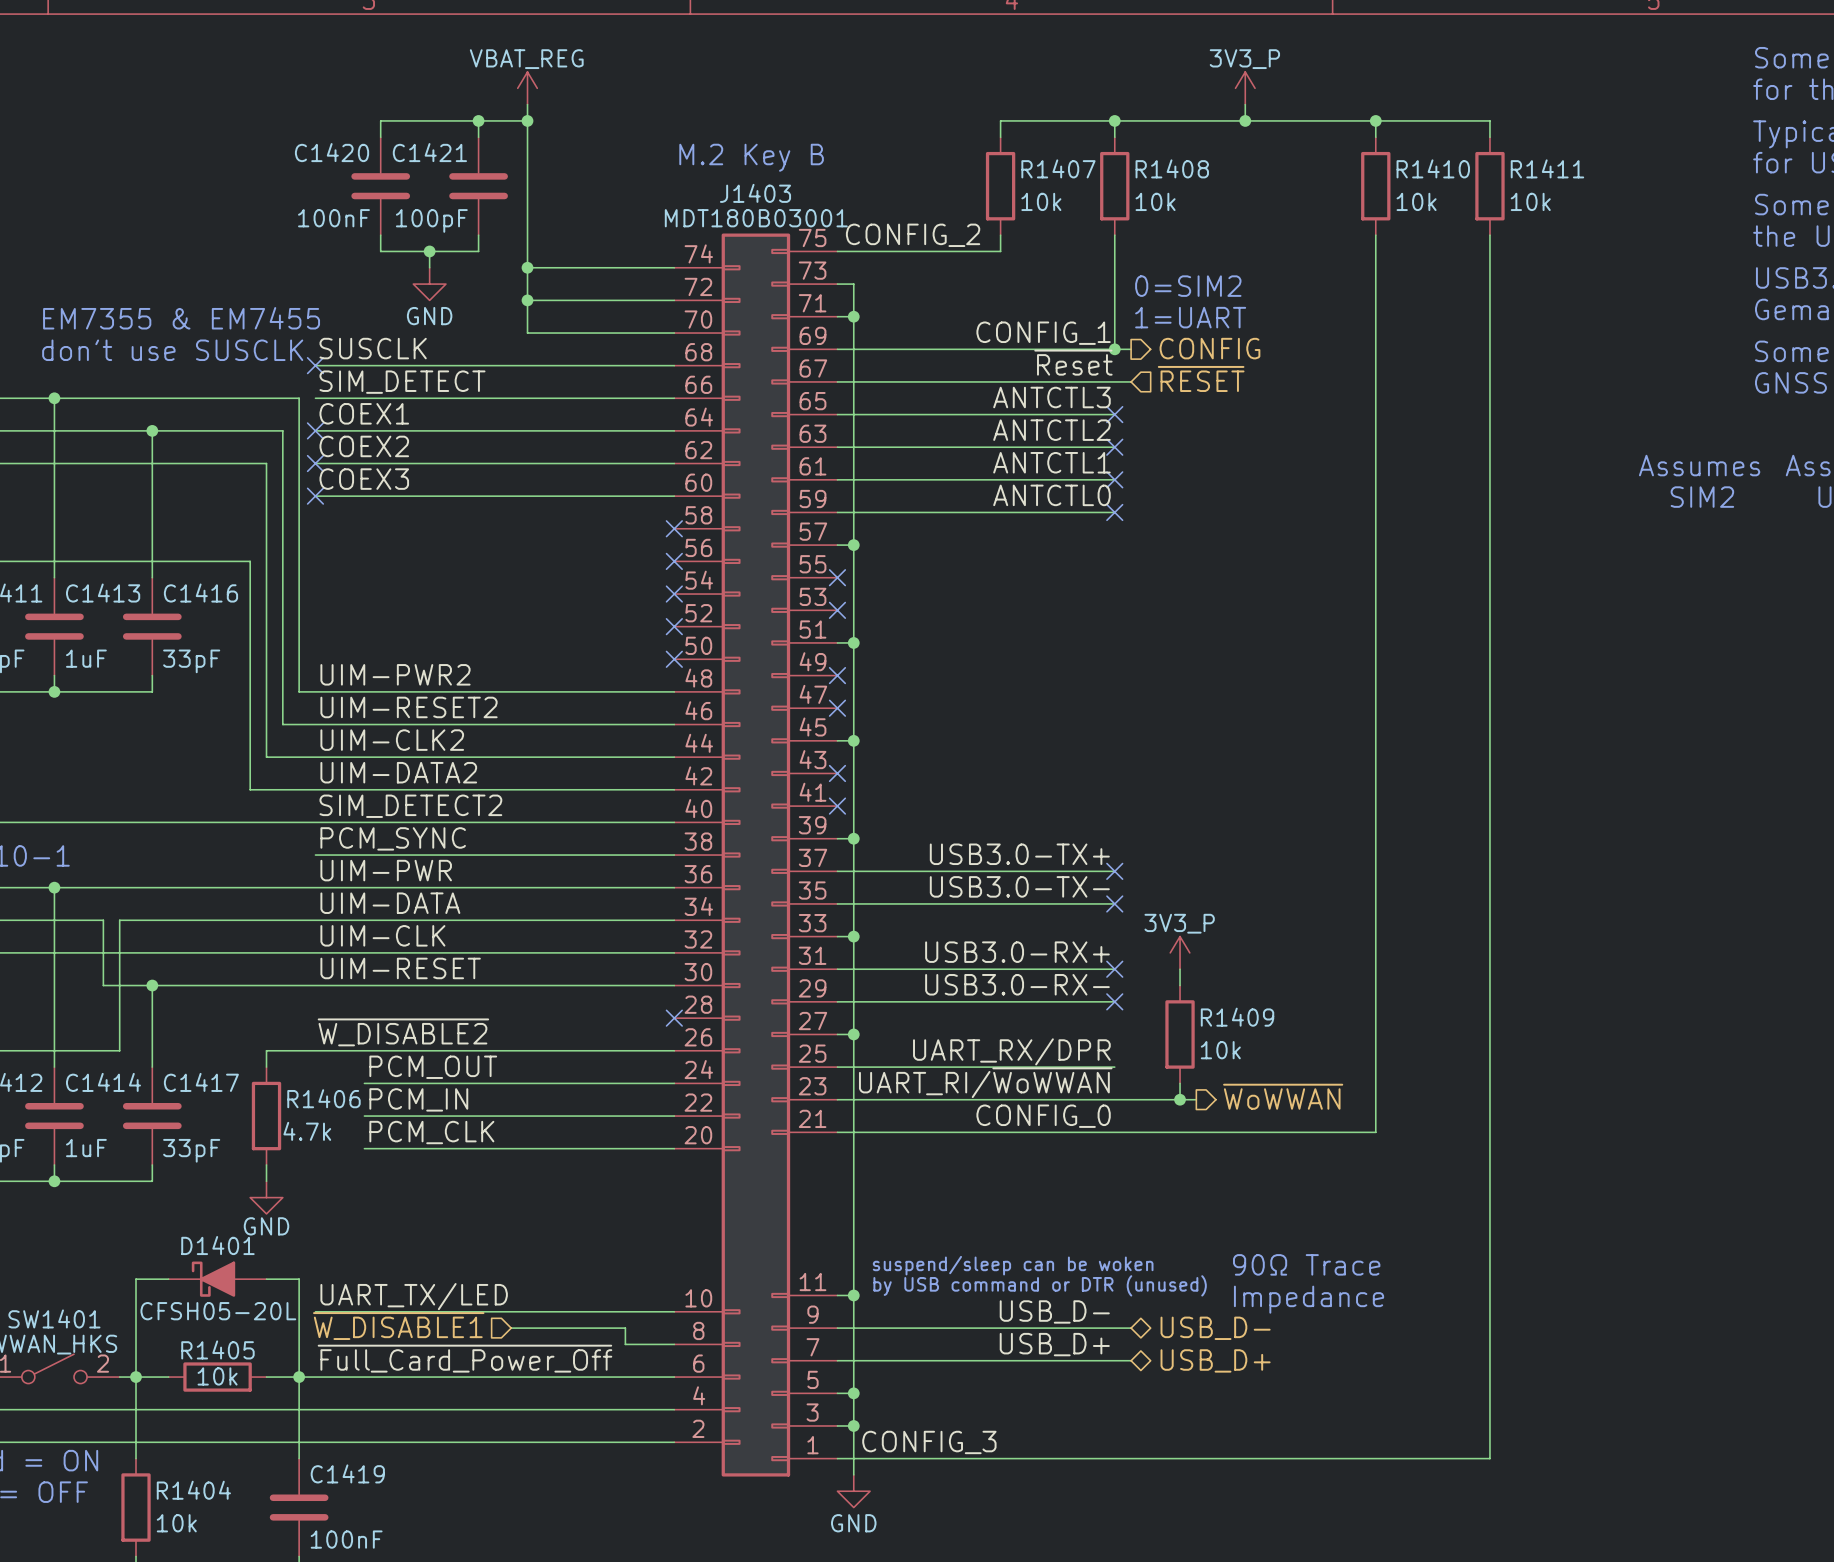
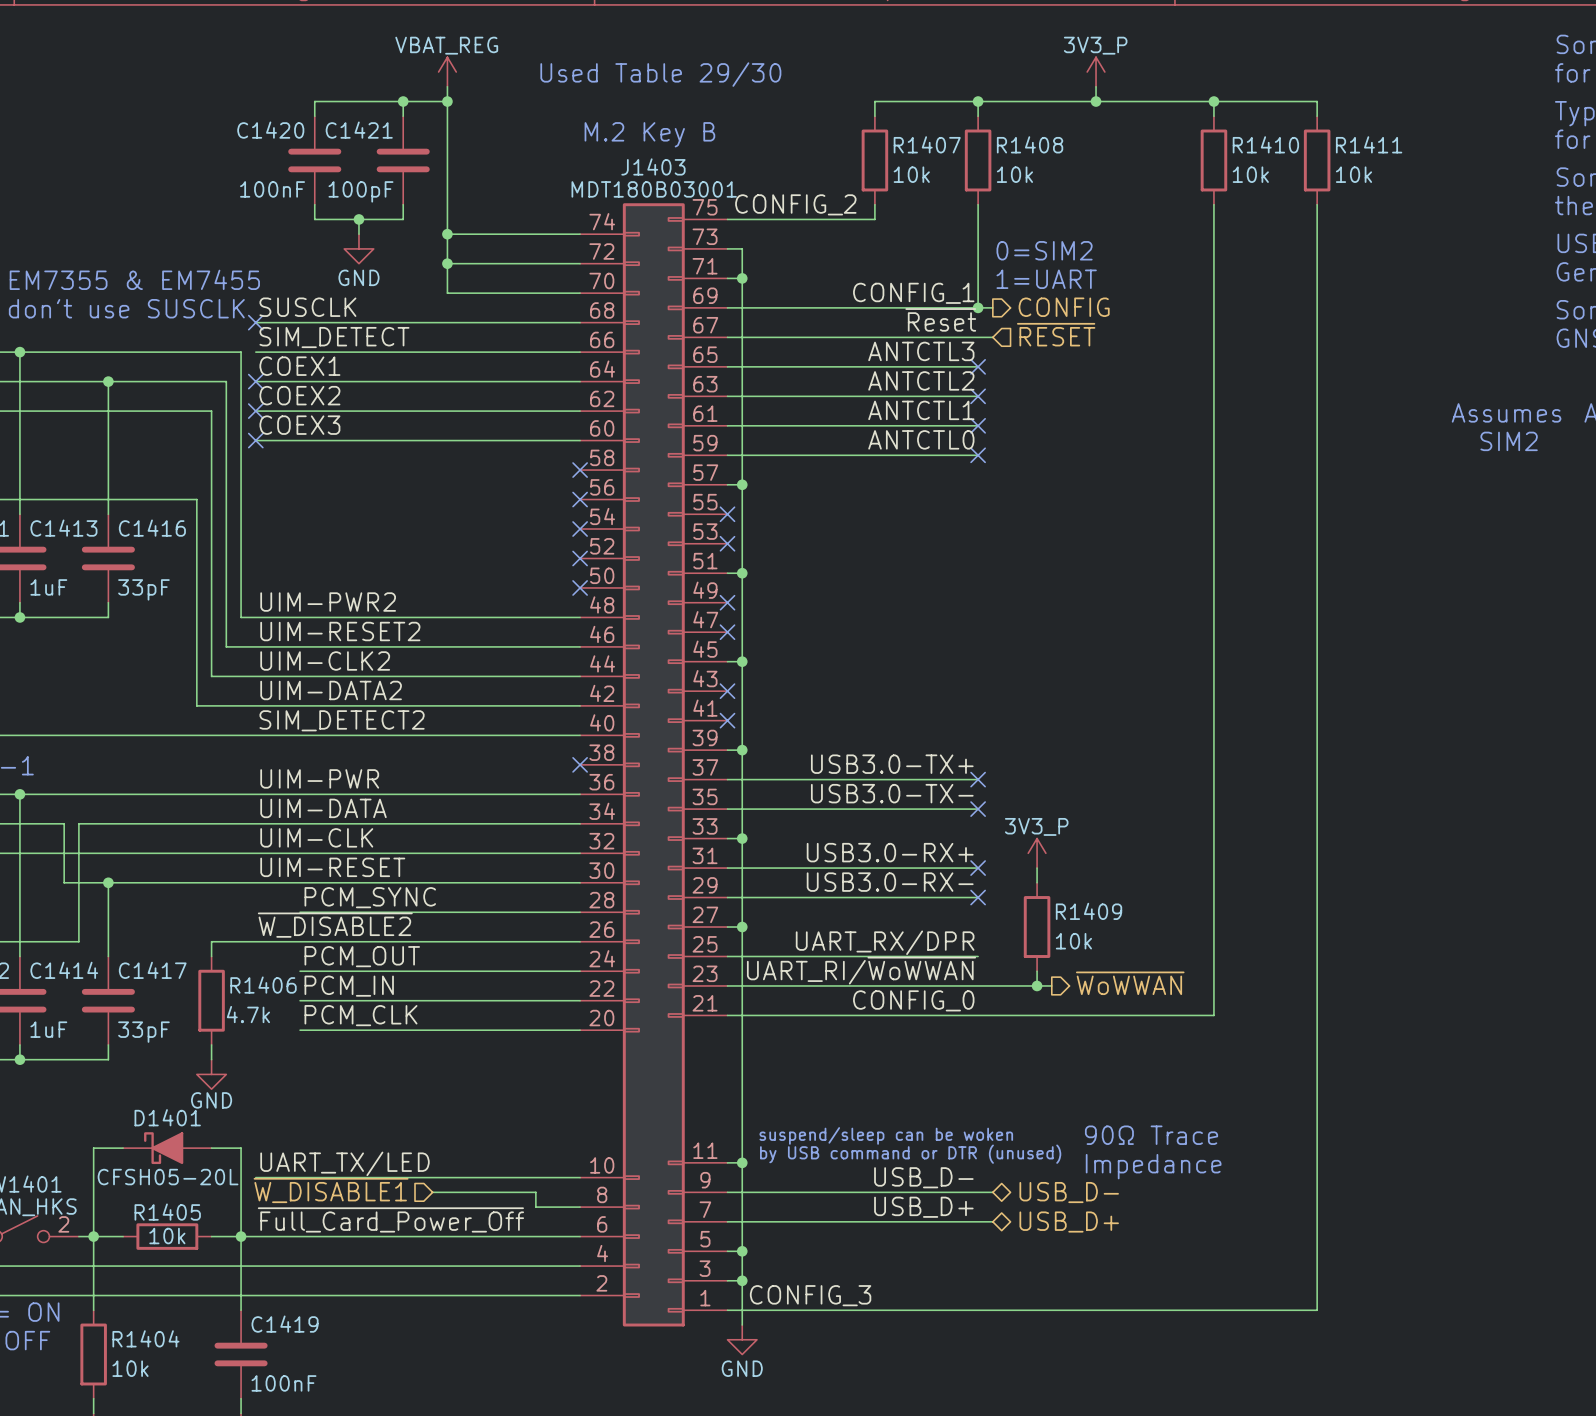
text: none -> Used Table 29/30 (660, 74)
label position: PCM_SYNC (393, 838) -> PCM_SYNC (370, 897)
wire: (315, 855) (674, 855) -> none
no-connect mark: none -> (580, 764)
wire: none -> (300, 912) (580, 912)
no-connect mark: (674, 1018) -> none

